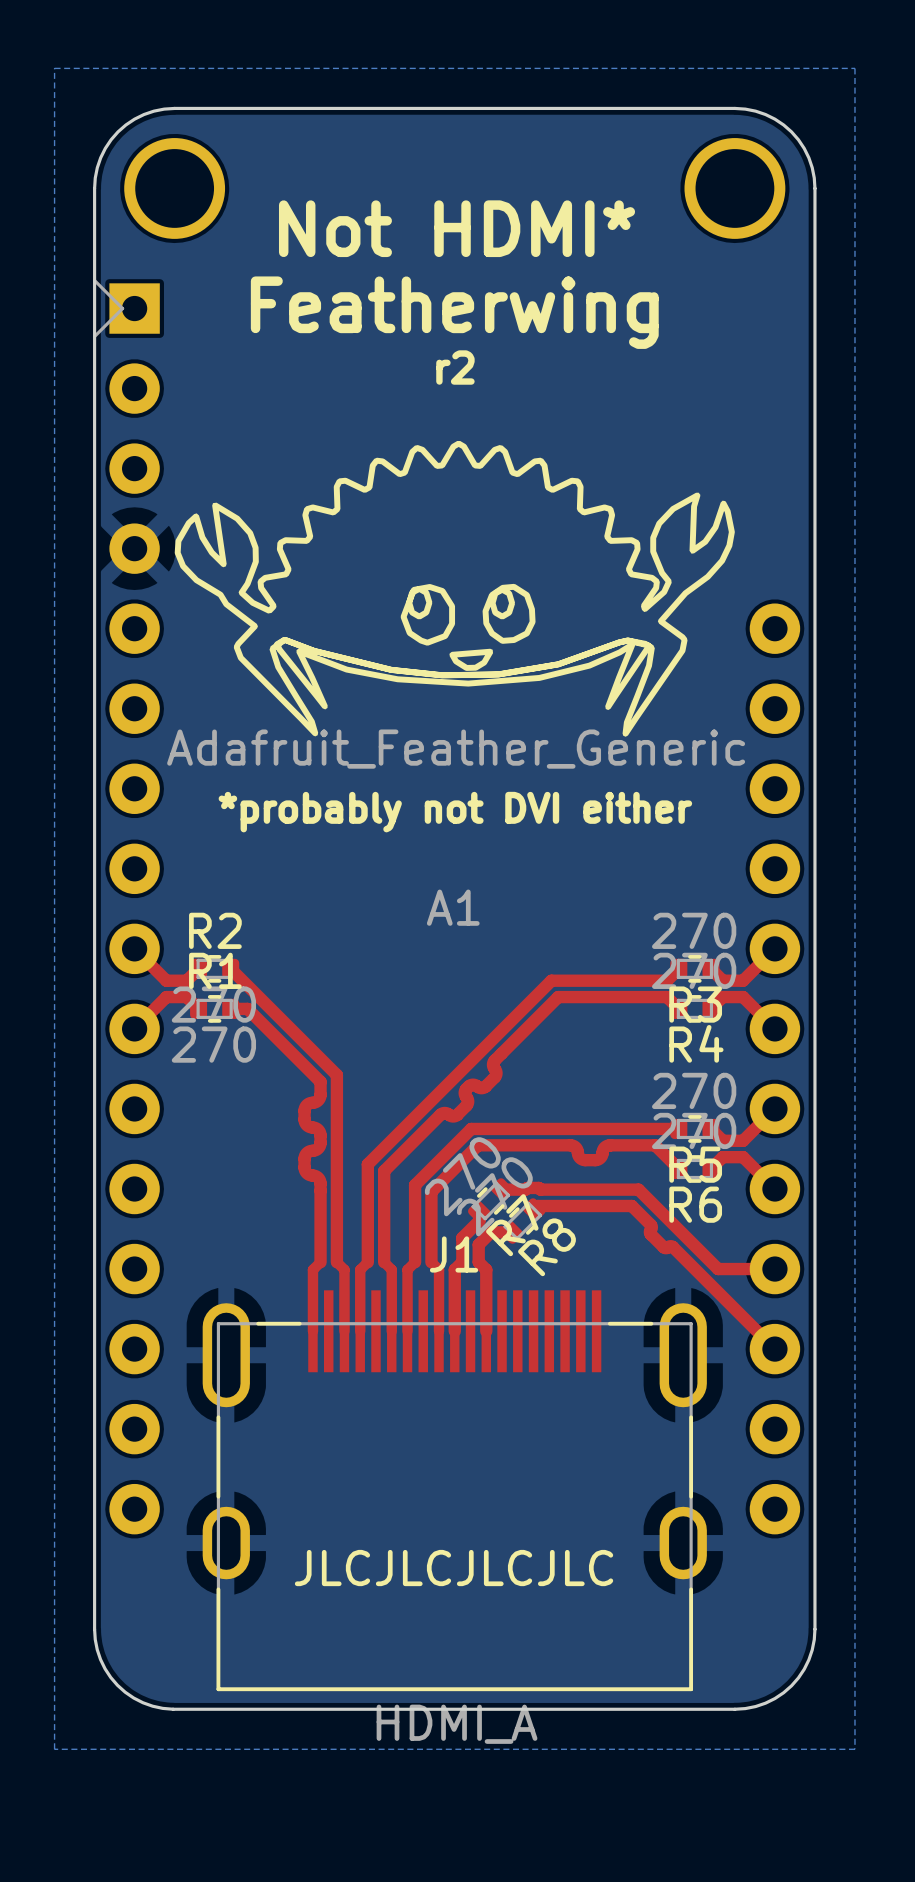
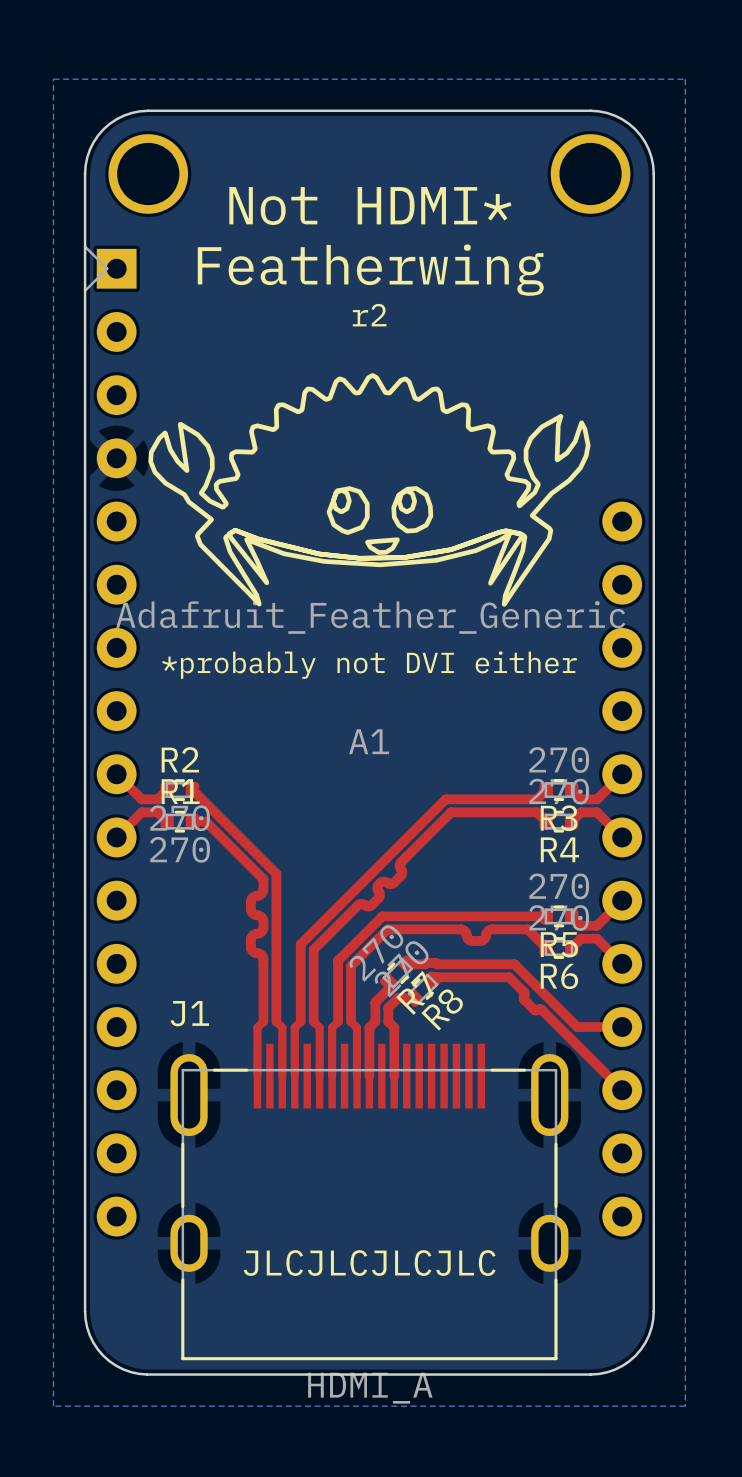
J1 name position: J1 (454, 1254) -> J1 (189, 1013)

